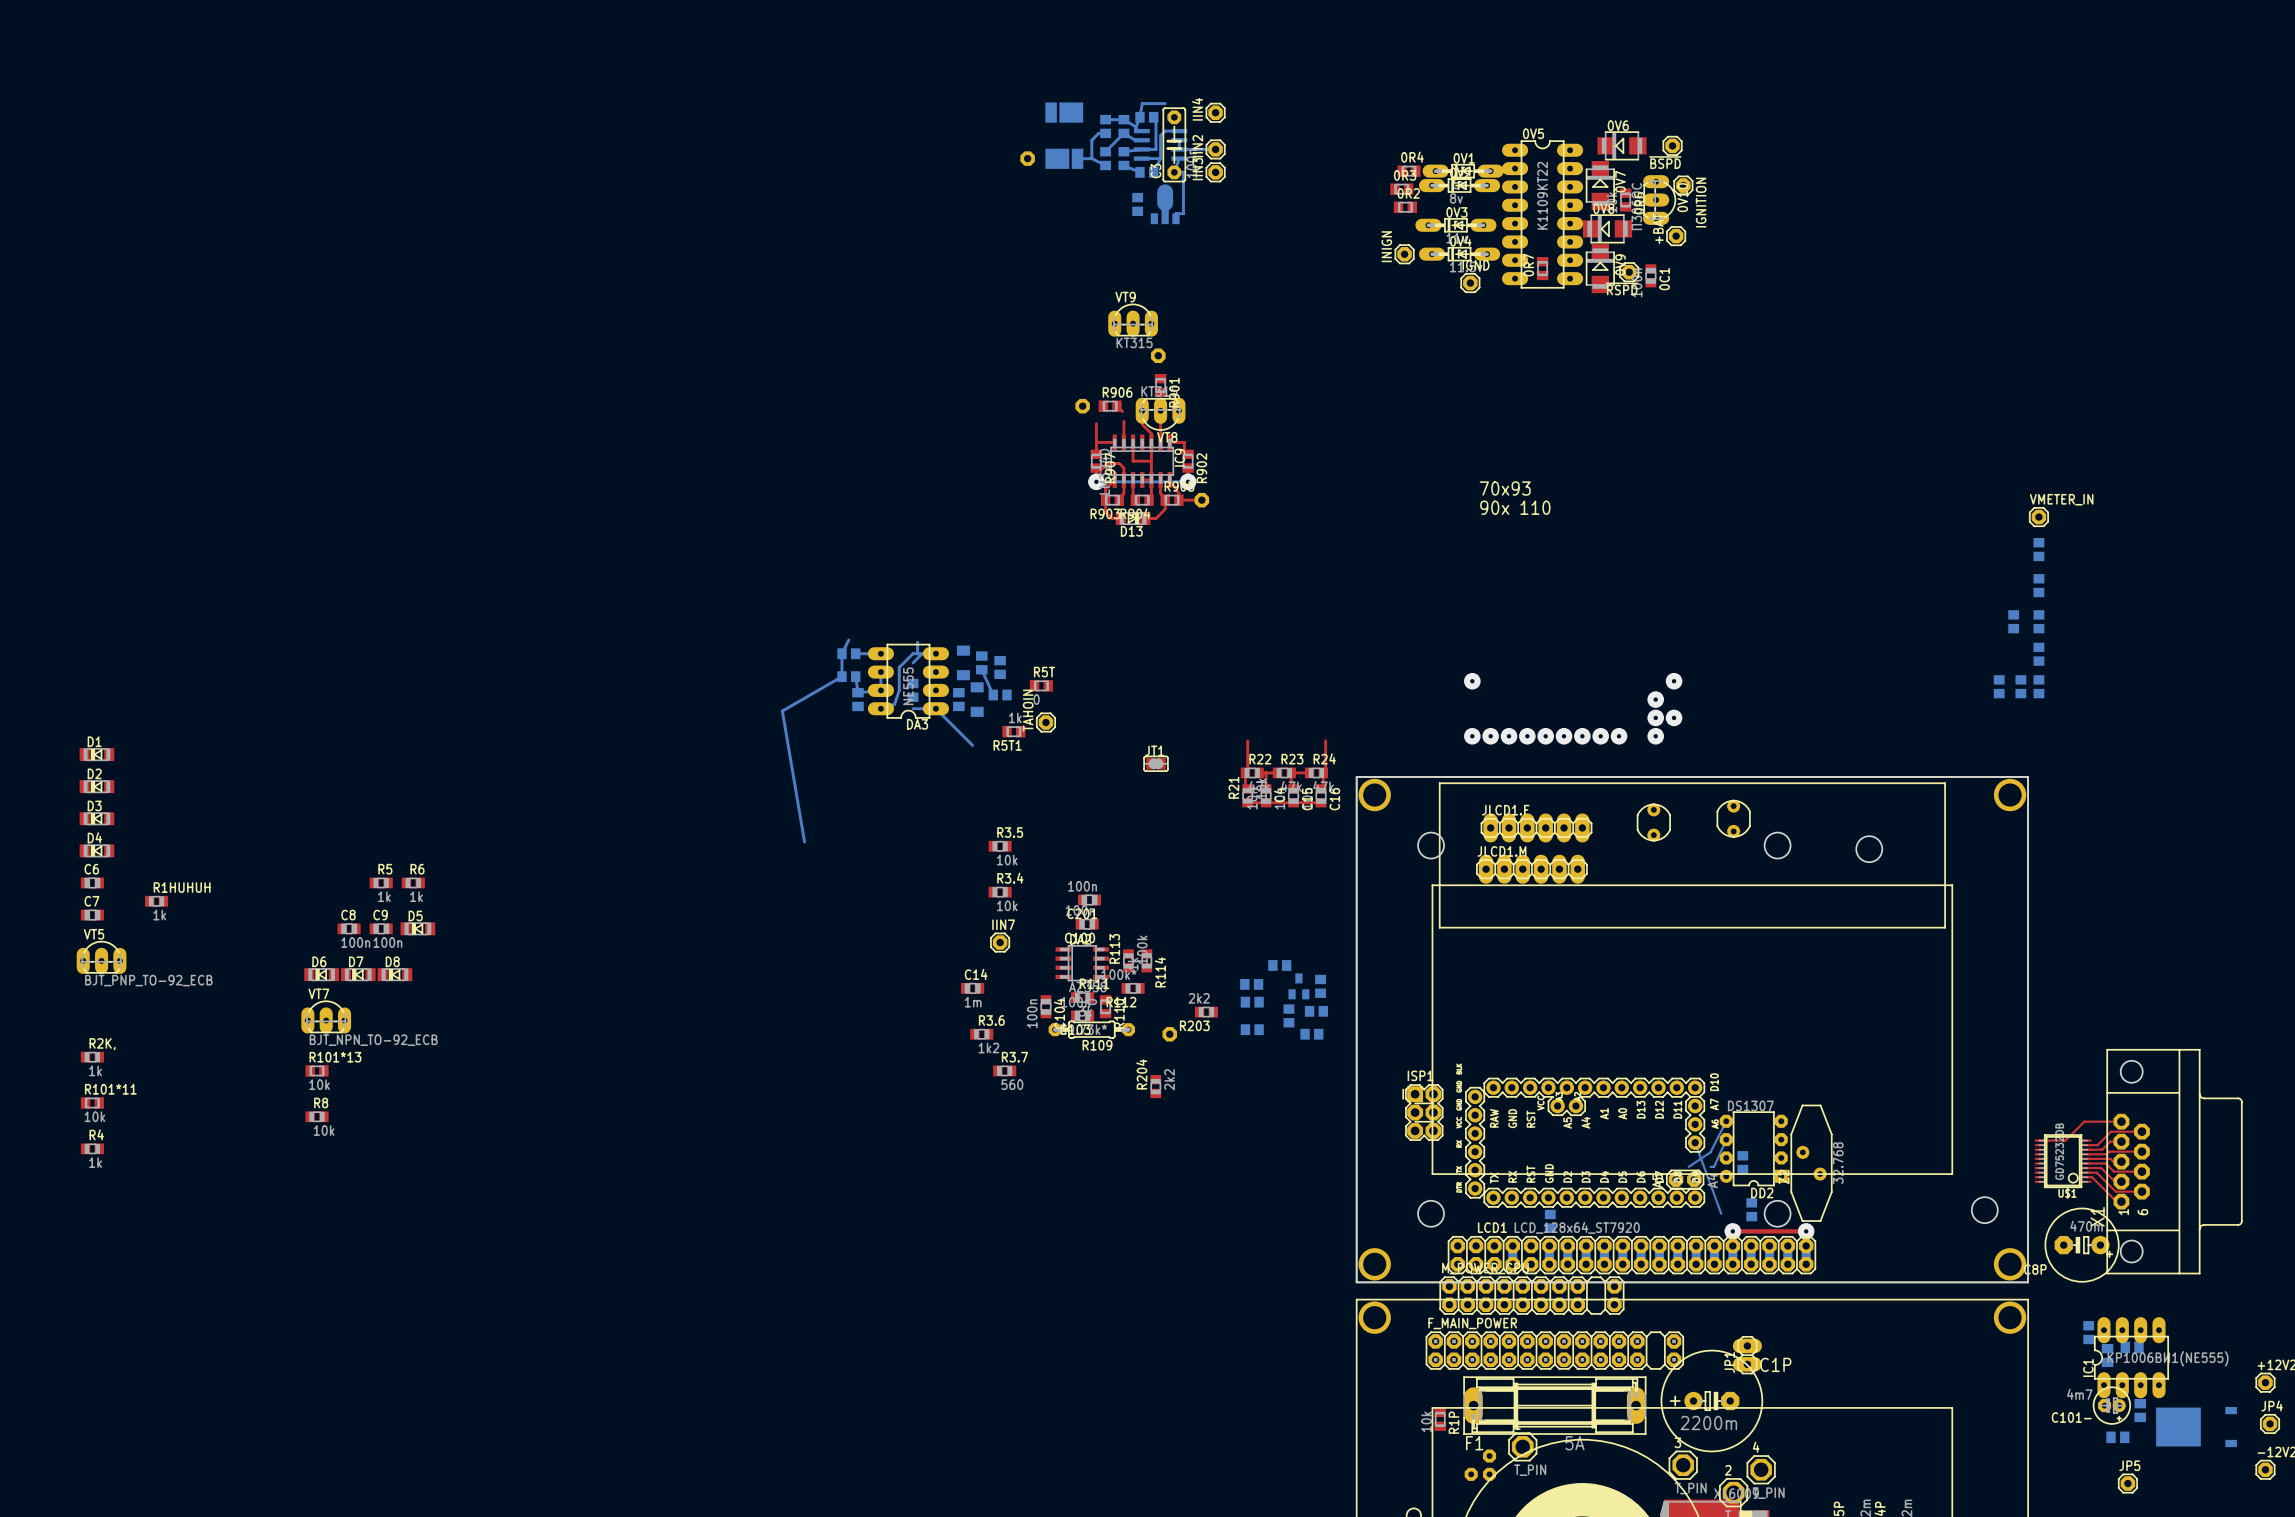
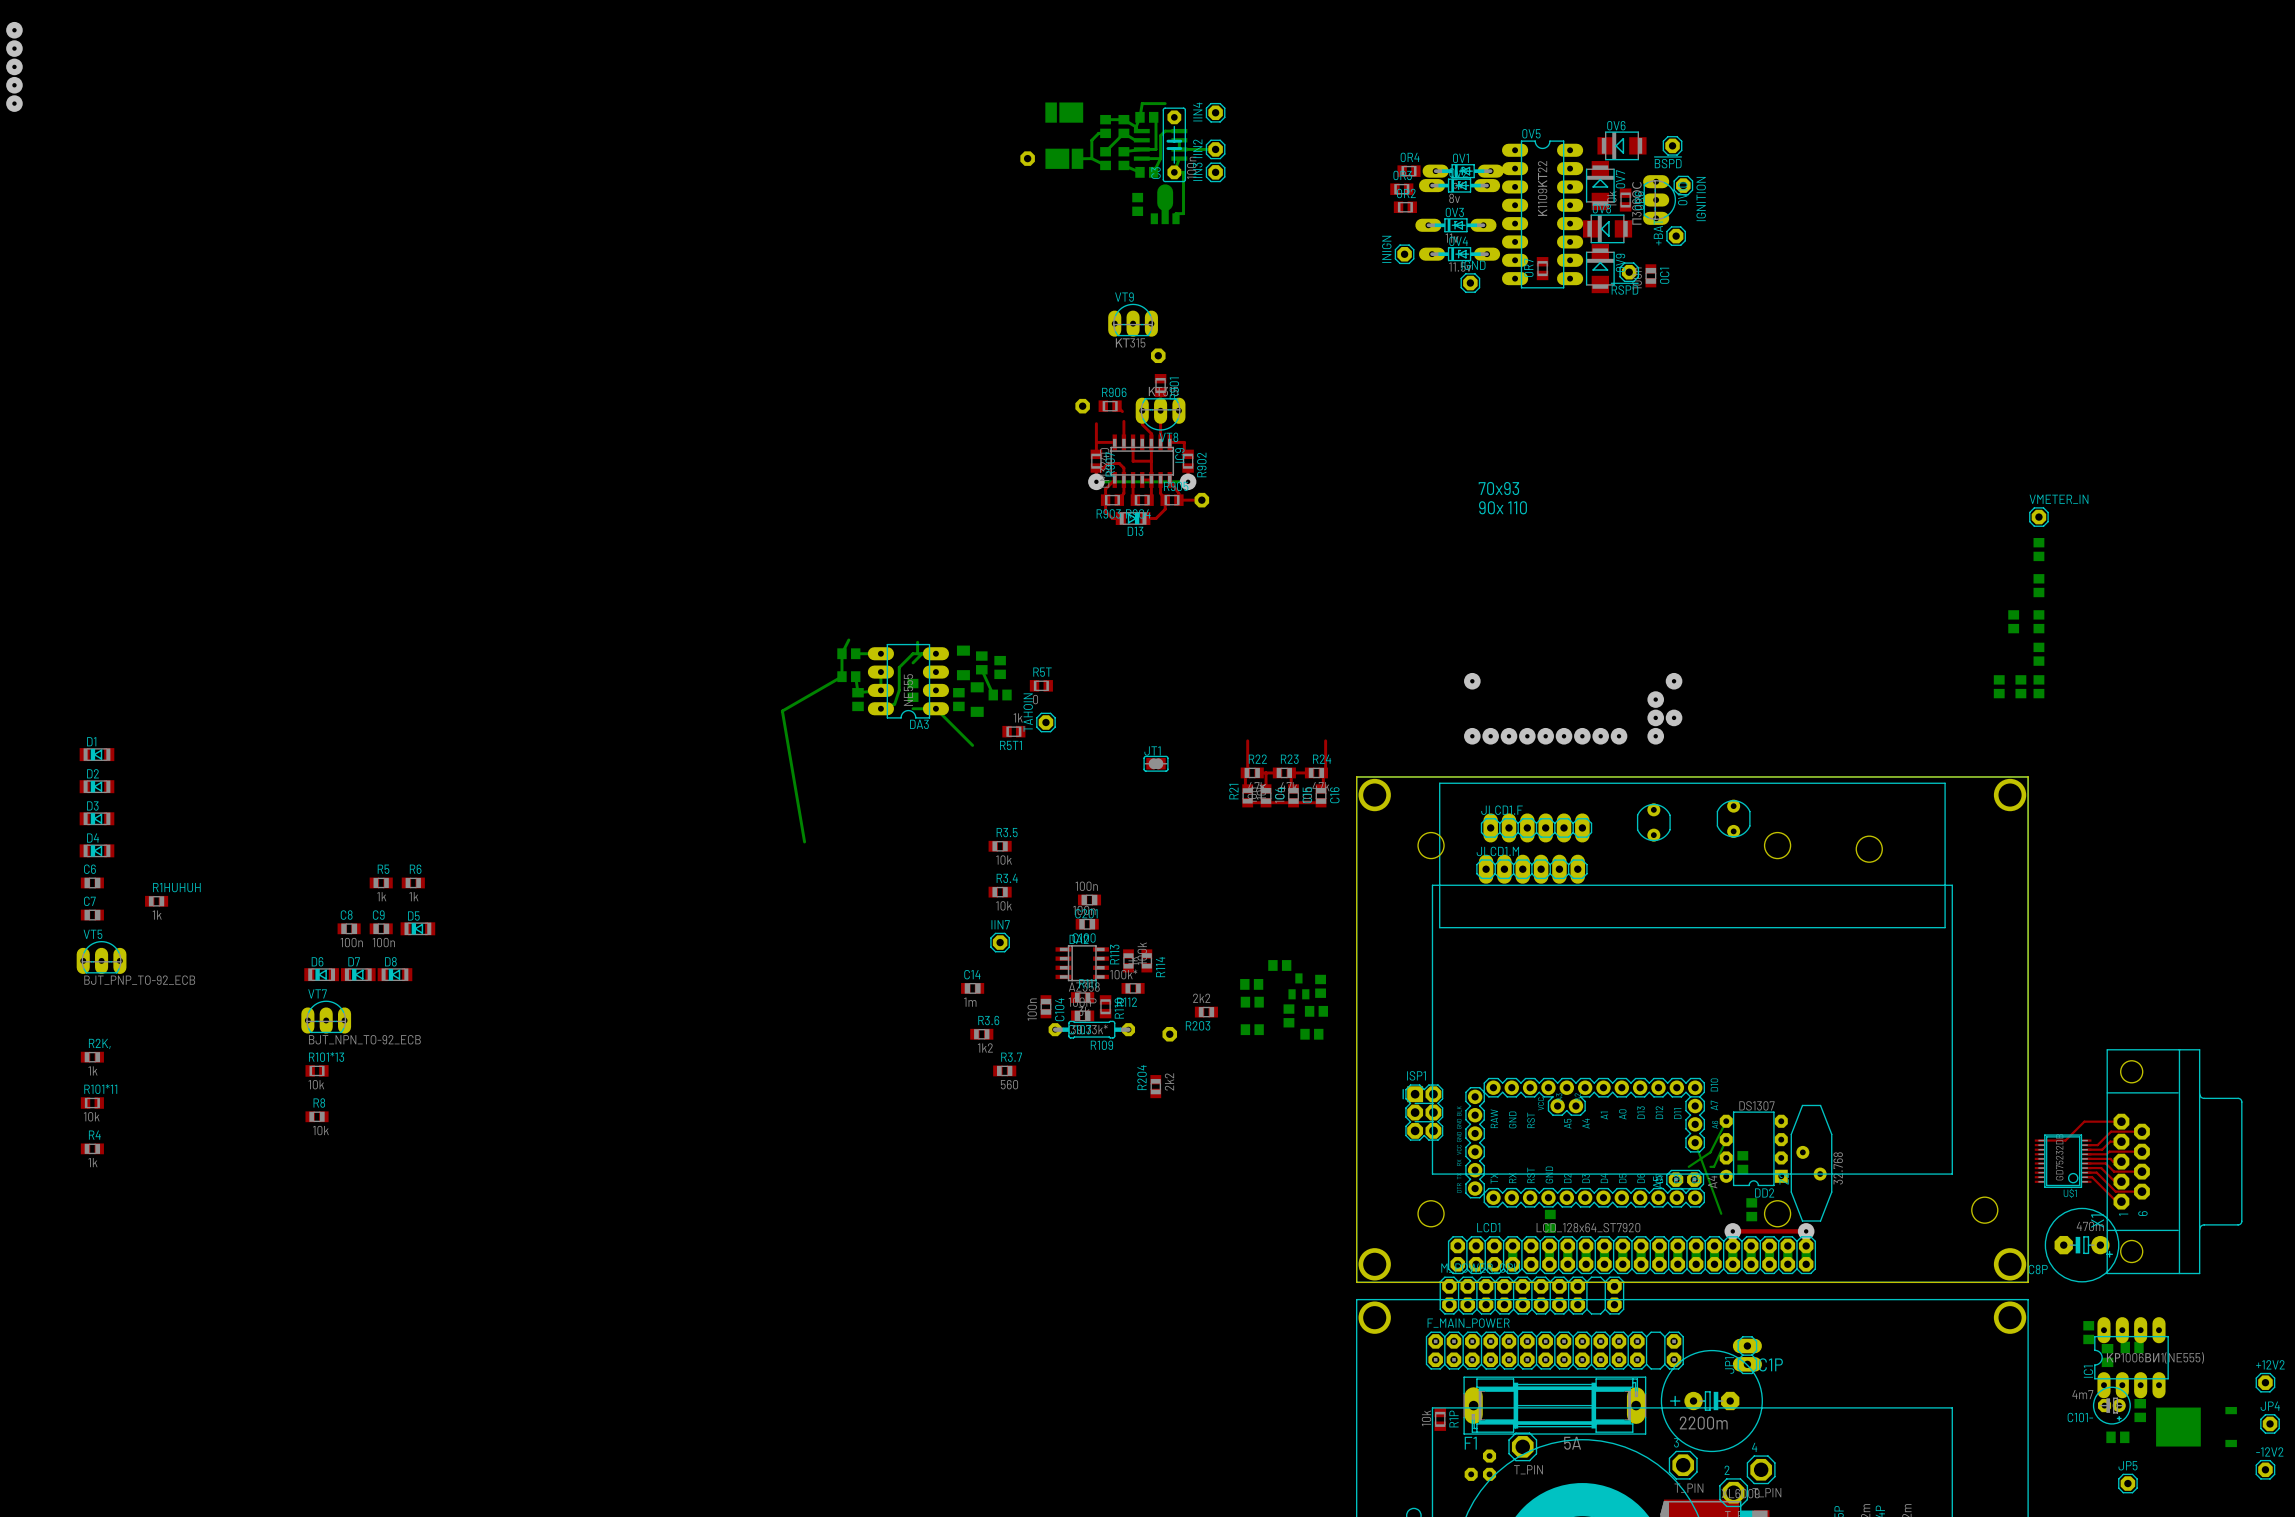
via: none -> (14, 30)
via: none -> (14, 48)
via: none -> (14, 66)
via: none -> (14, 85)
via: none -> (14, 103)

